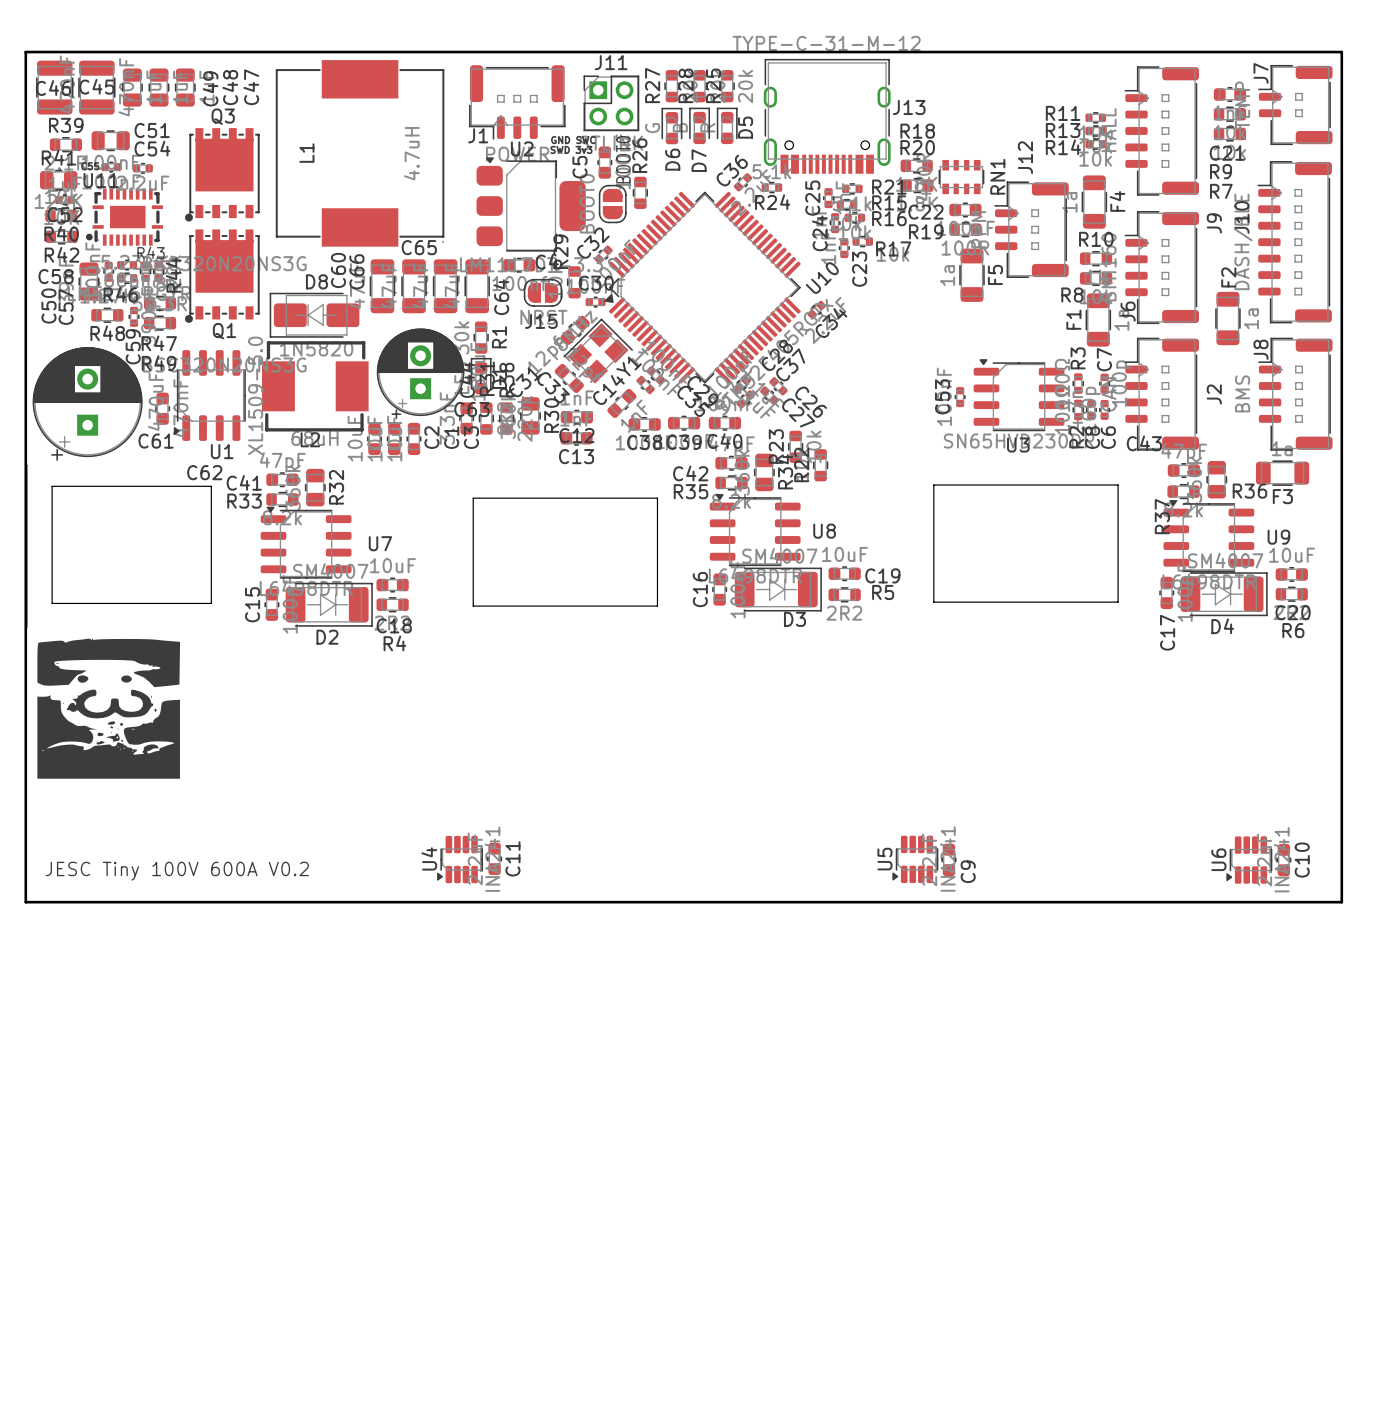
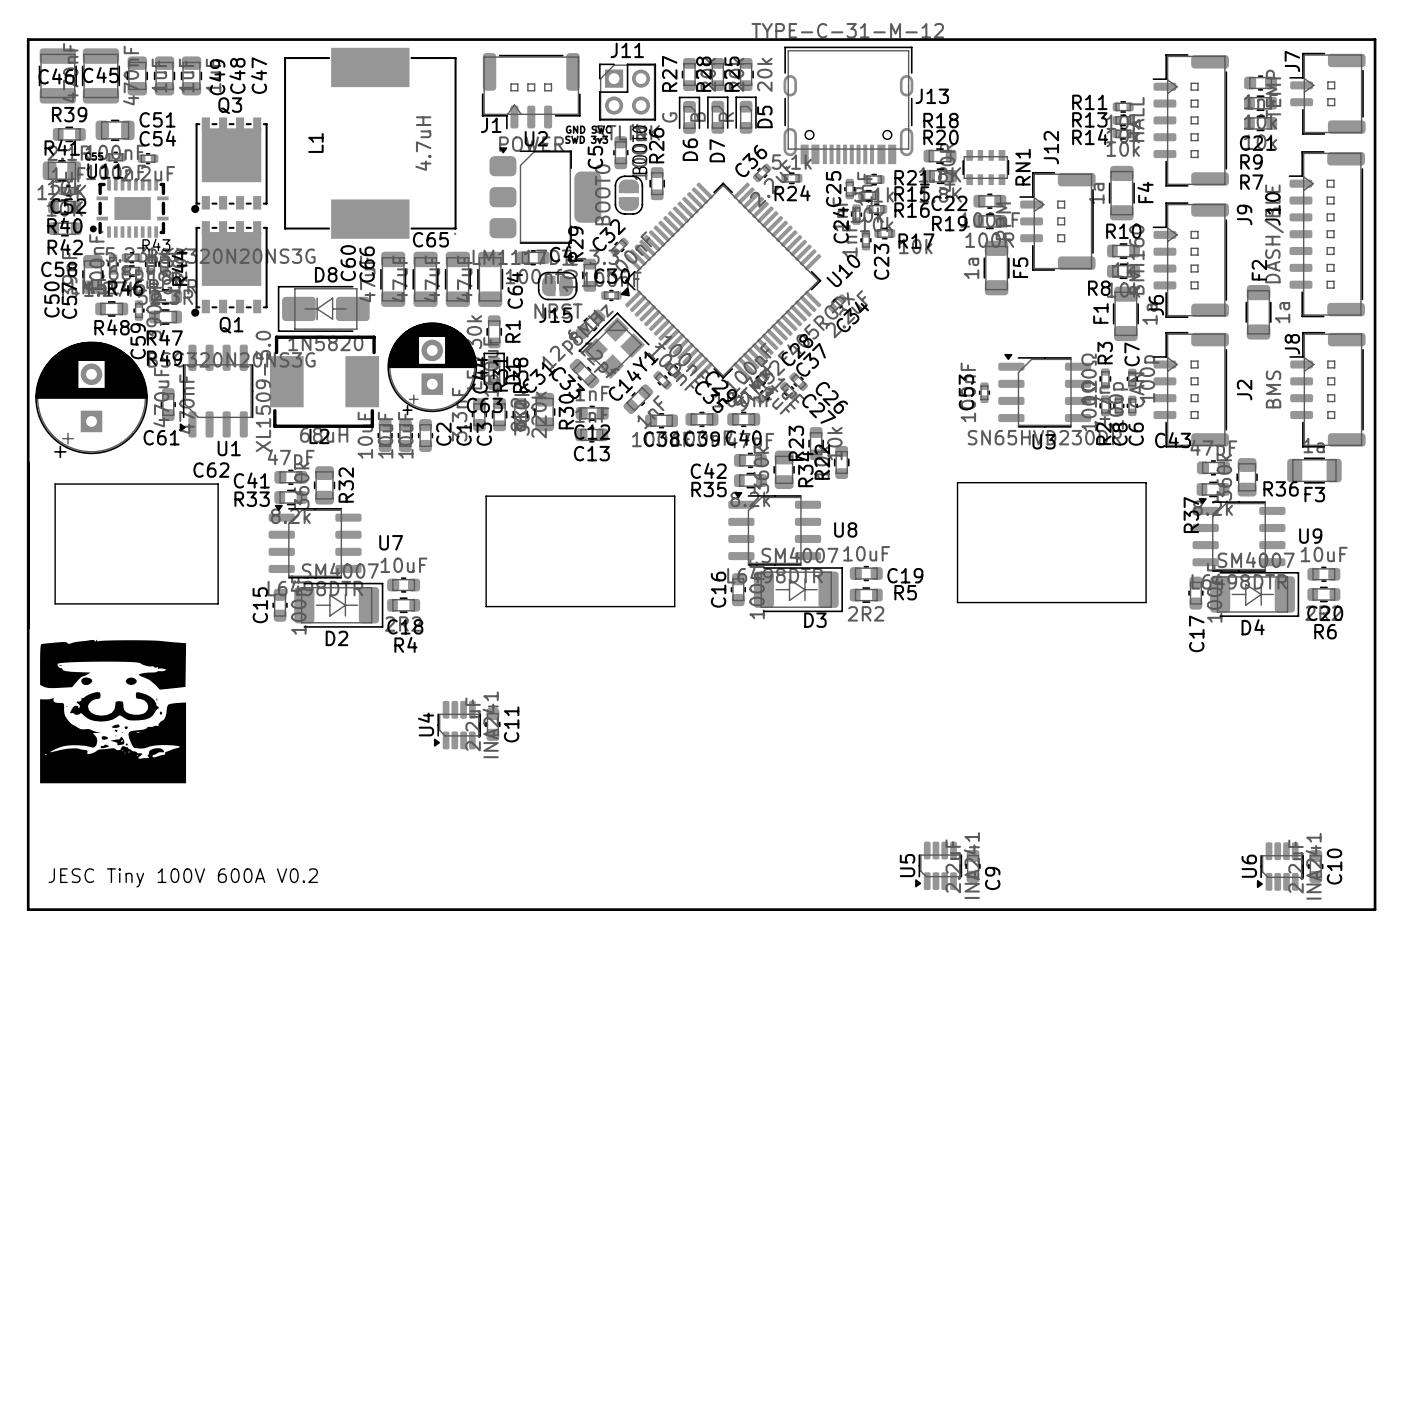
C11 position: (494, 858) -> (492, 724)
U4 position: (460, 859) -> (457, 725)

